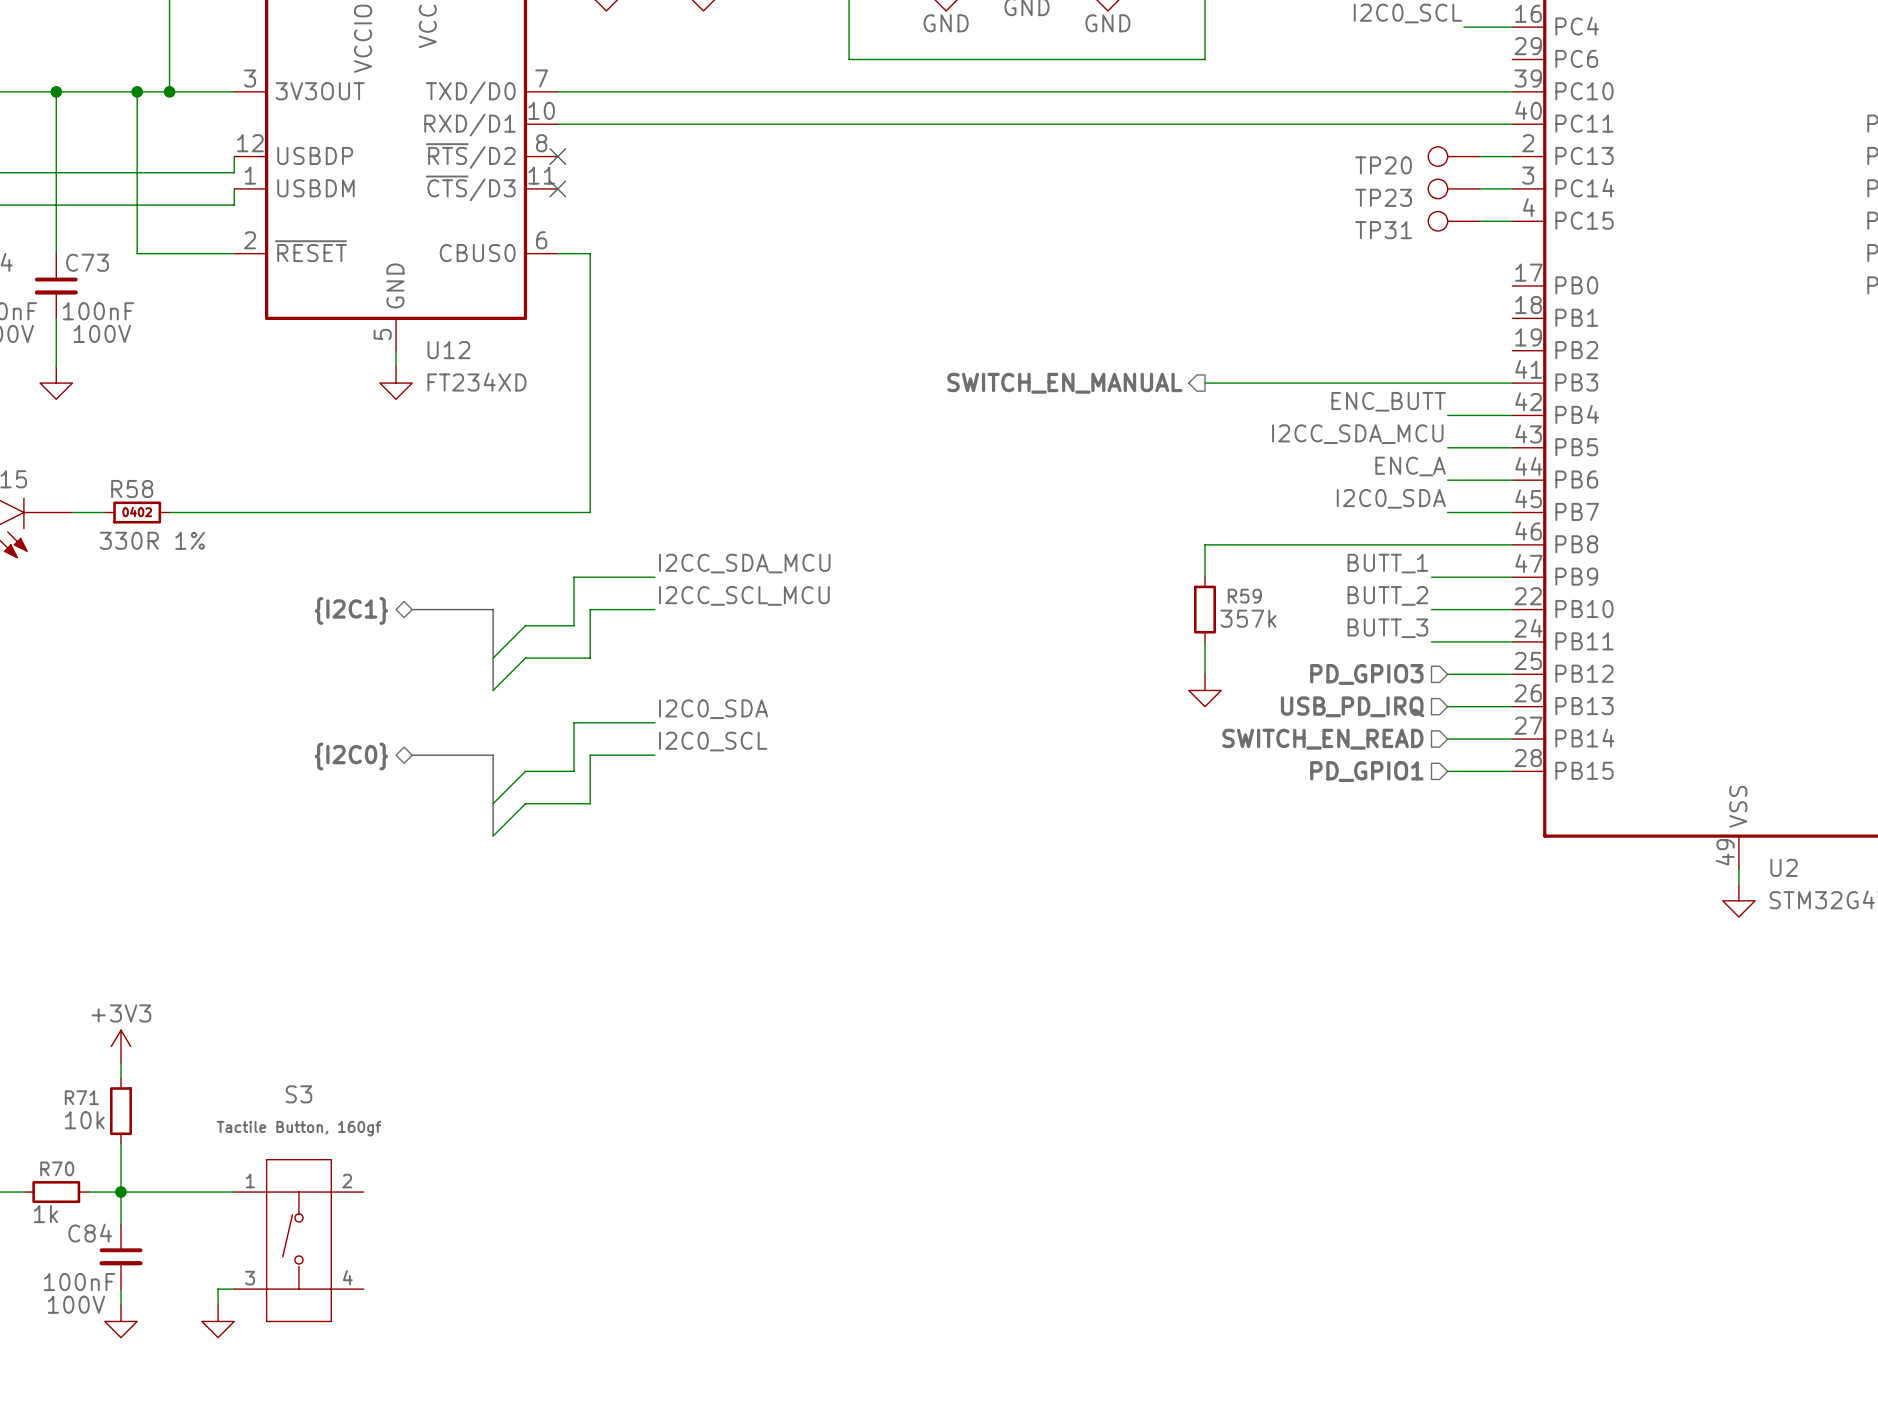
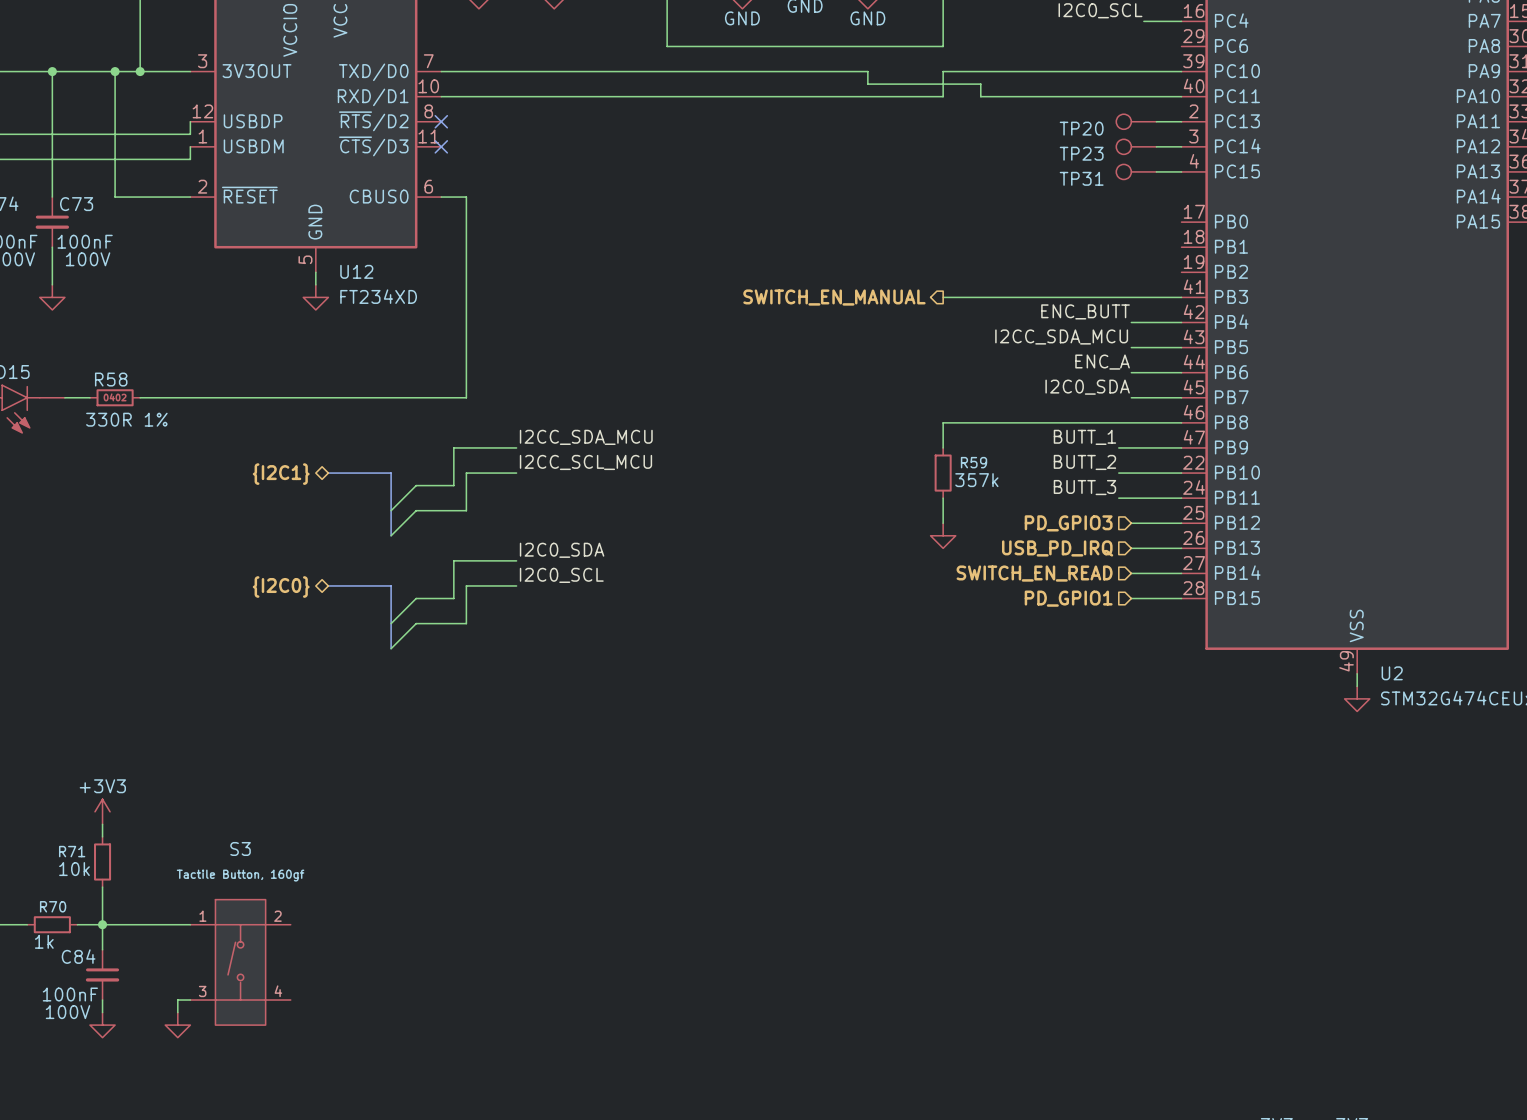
wire: (1107, 91) (1204, 91) -> (867, 71) (867, 84) (980, 84) (980, 96)
wire: (1204, 124) (1253, 124) -> (943, 96) (943, 71)

